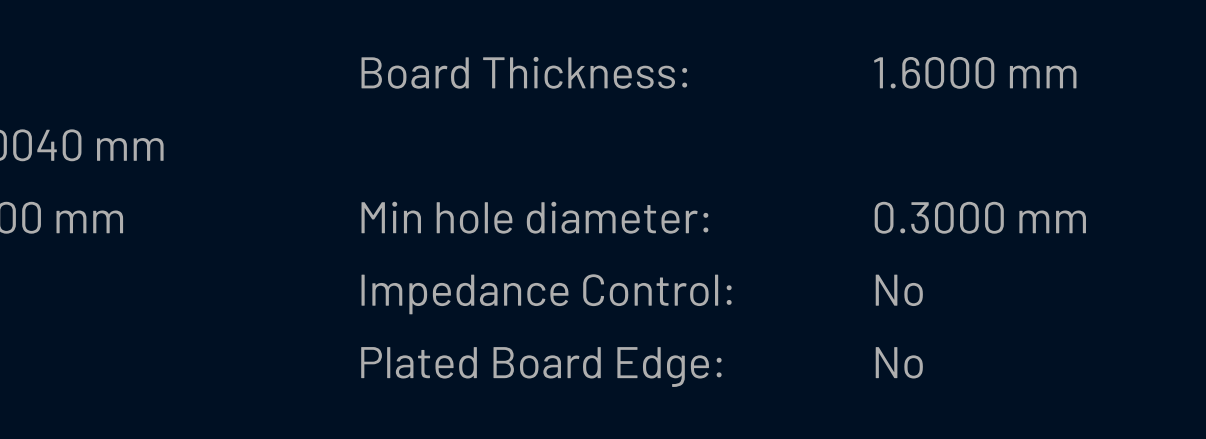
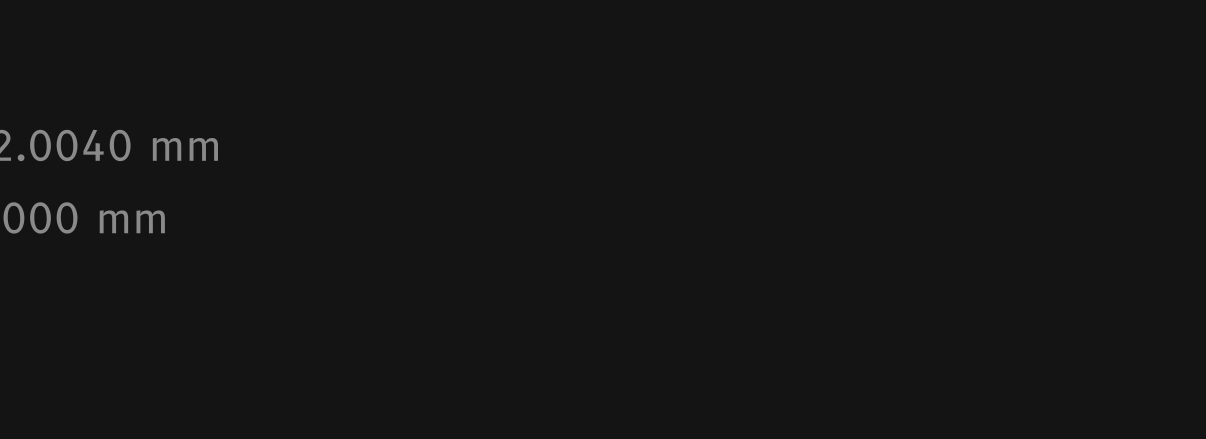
text: Board Thickness: (524, 72) -> none
text: 1.6000 mm (975, 72) -> none
text: Min hole diameter: (534, 217) -> none
text: 0.3000 mm (980, 217) -> none
text: No (899, 290) -> none
text: Impedance Control: (546, 294) -> none
text: No (899, 362) -> none
text: Plated Board Edge: (541, 367) -> none

